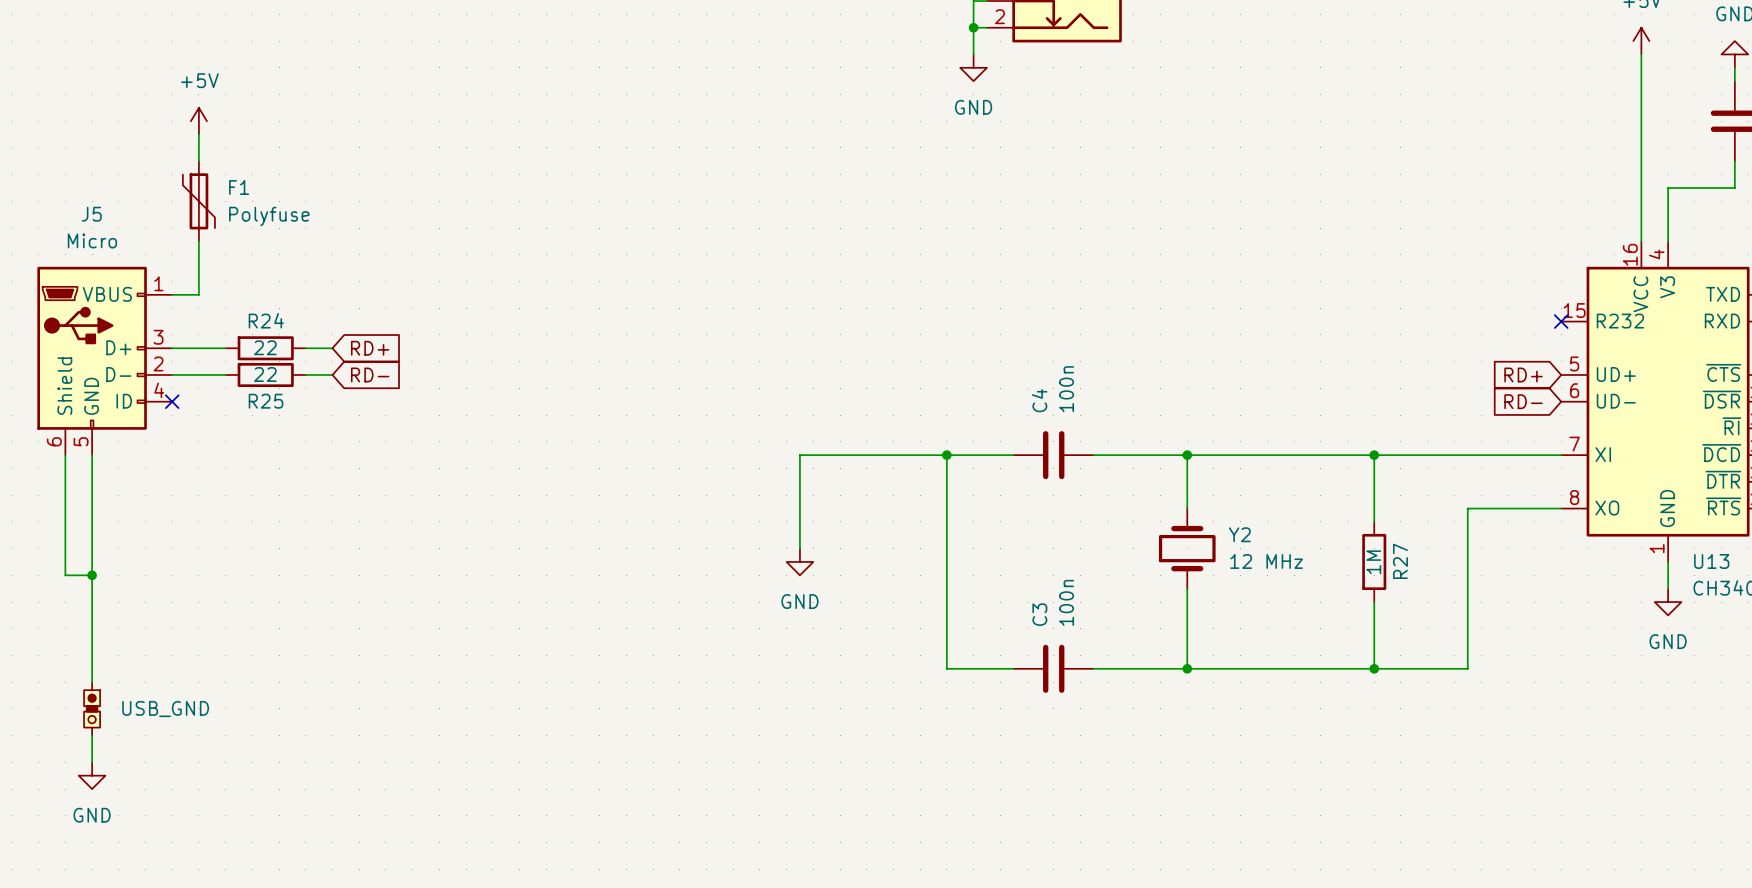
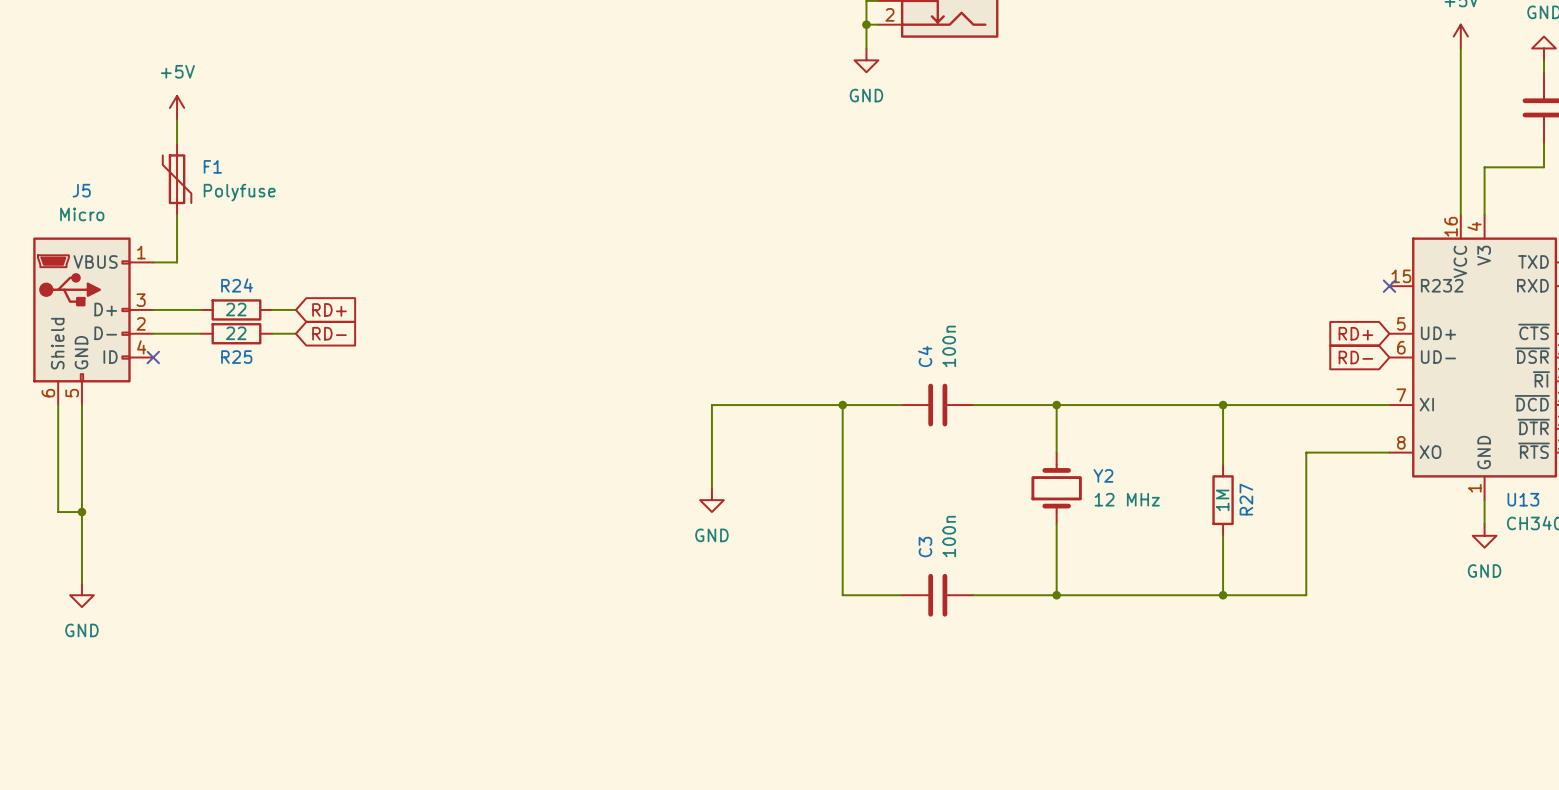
part: USB_GND (92, 708) -> none
wire: (92, 735) (92, 762) -> none
power symbol position: GND (92, 775) -> GND (81, 595)

